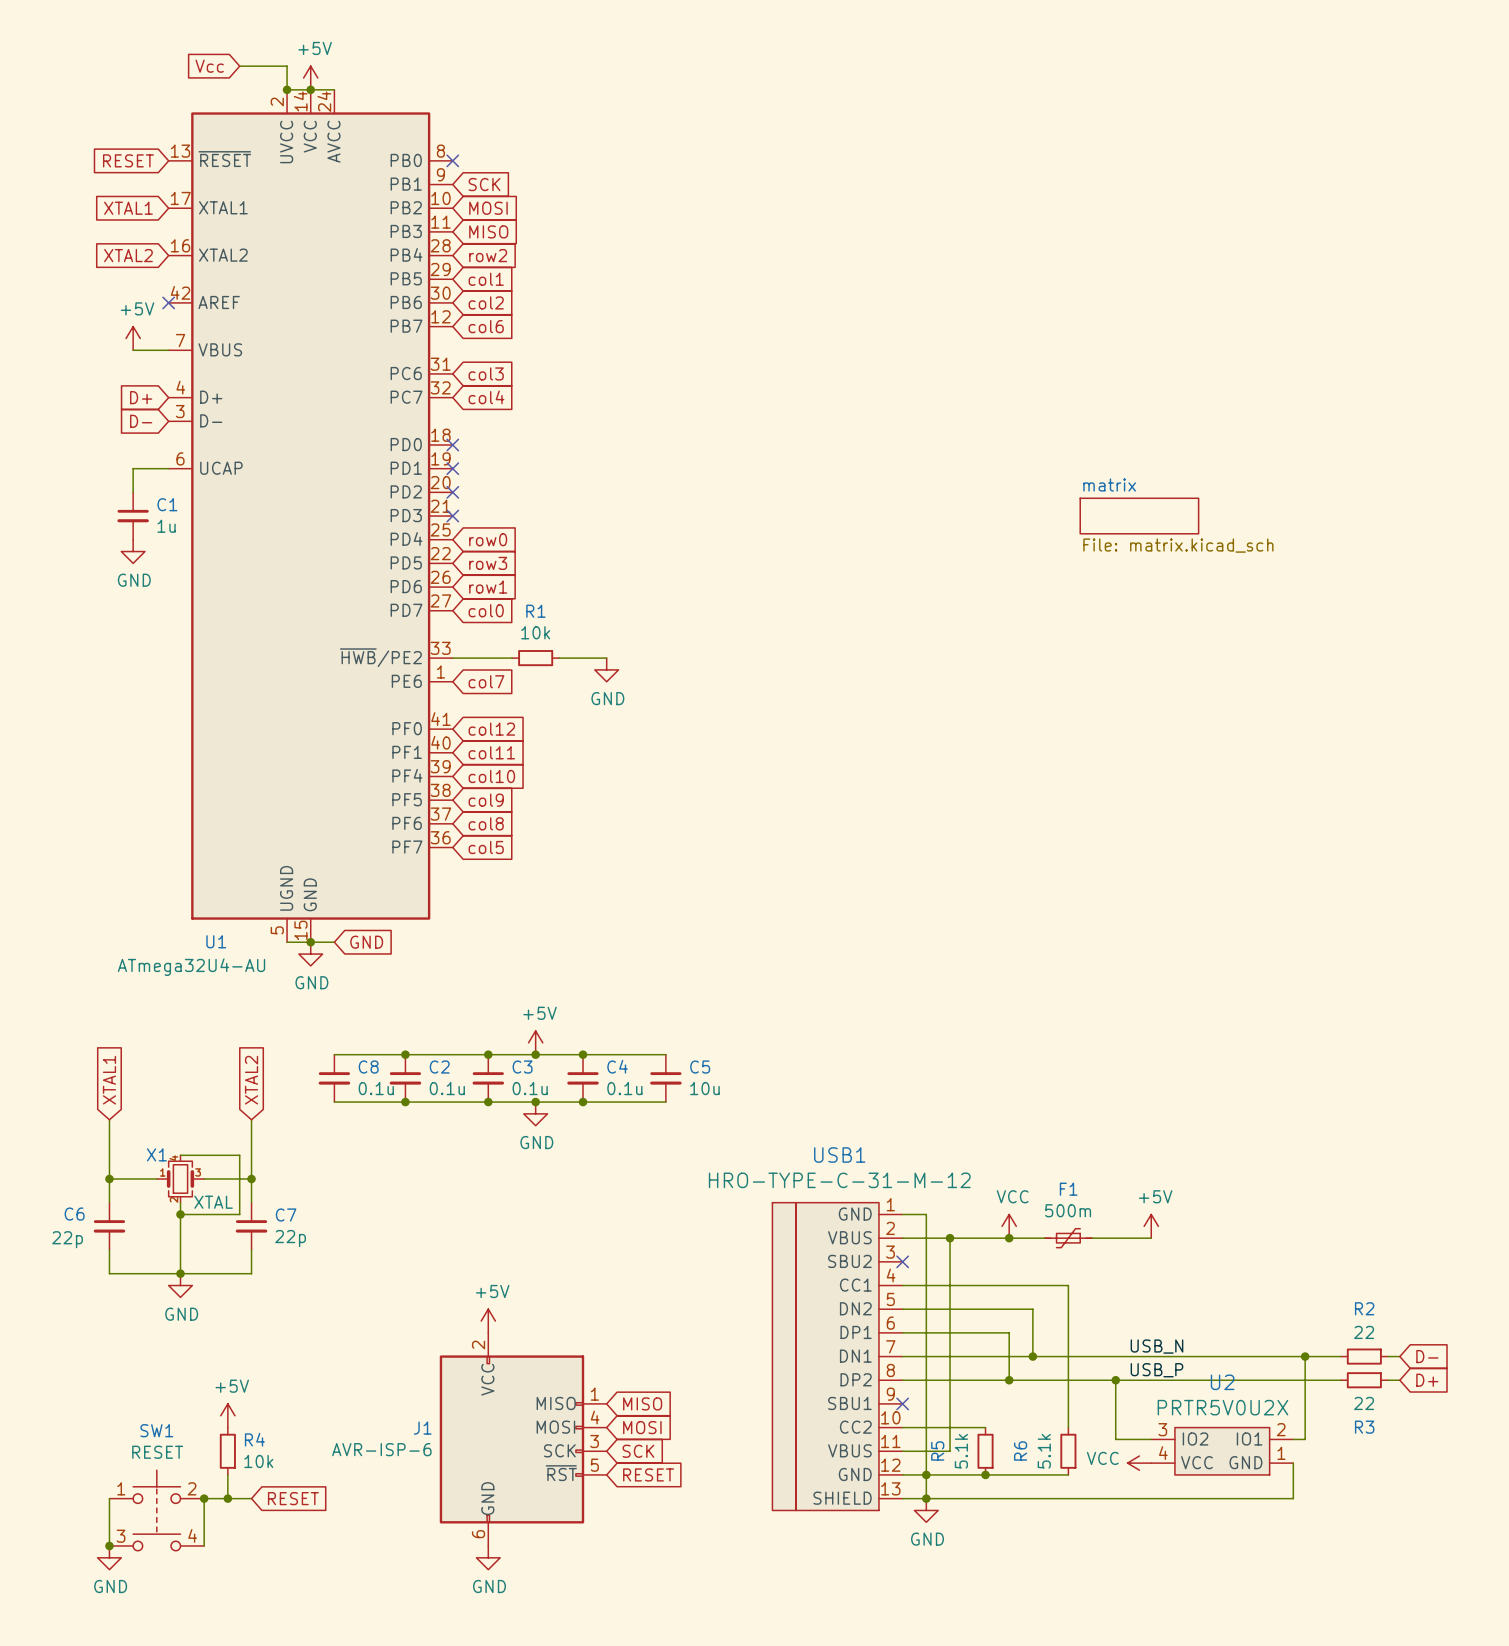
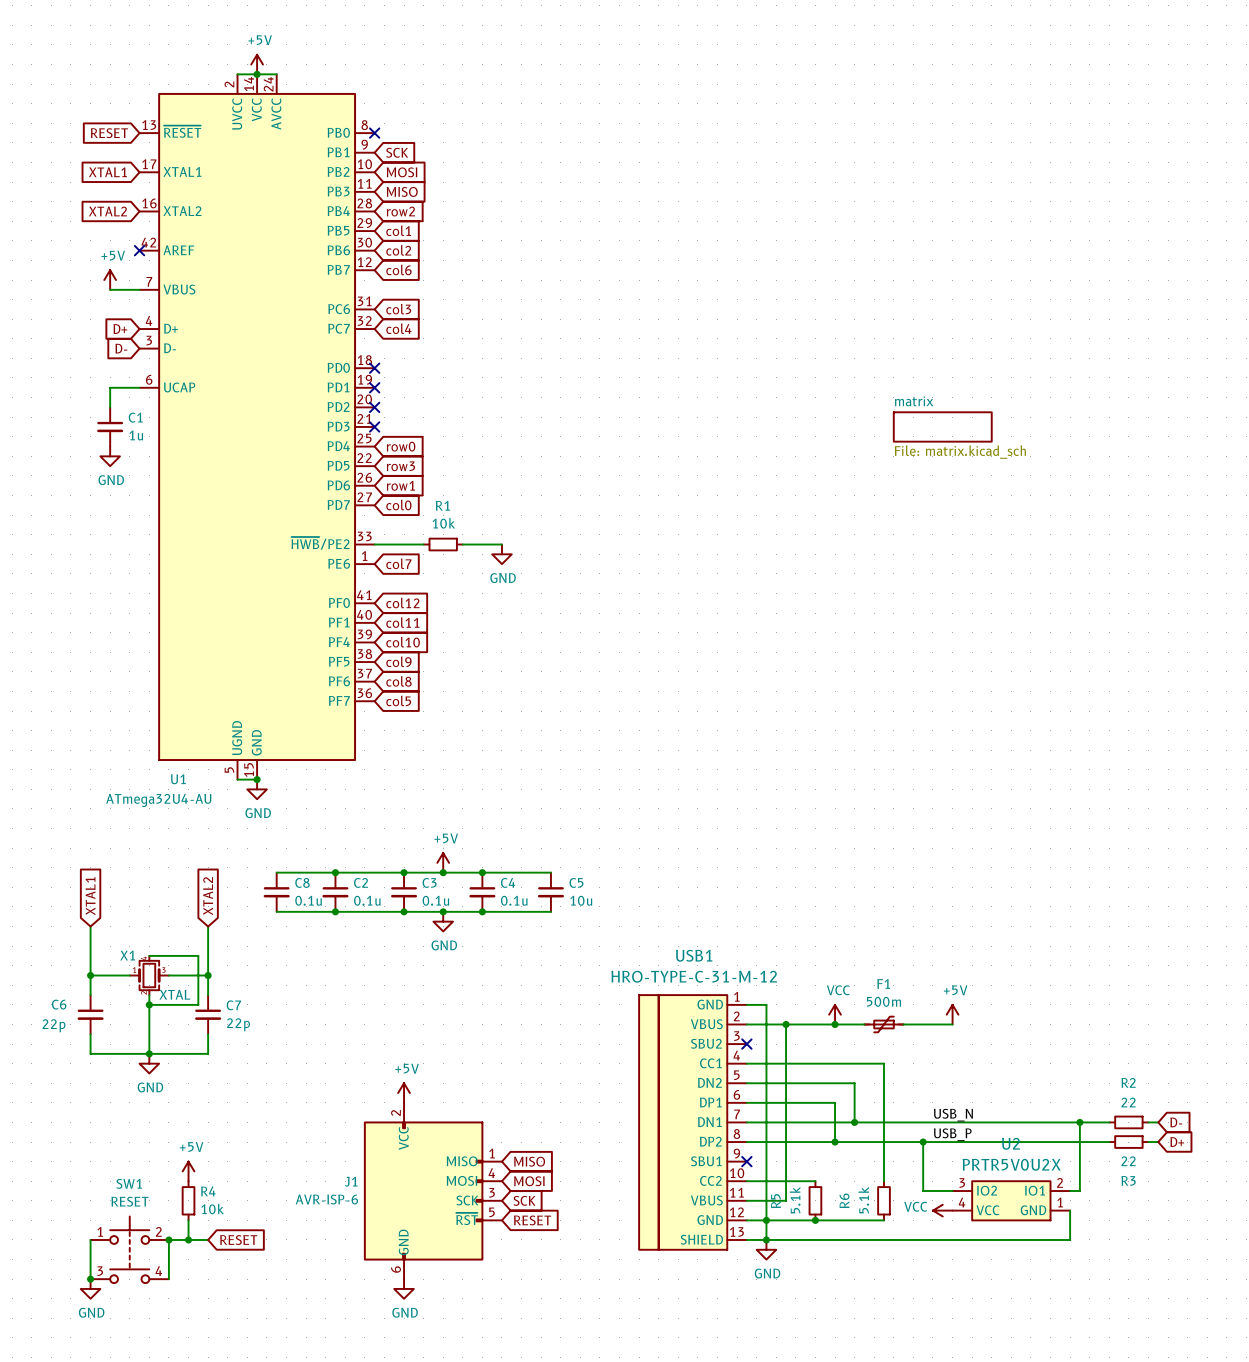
global label: Vcc (209, 66) -> none
wire: (239, 66) (287, 66) (287, 89) -> none
junction: (287, 89) -> none
wire: (310, 942) (334, 942) -> none
global label: GND (366, 942) -> none

